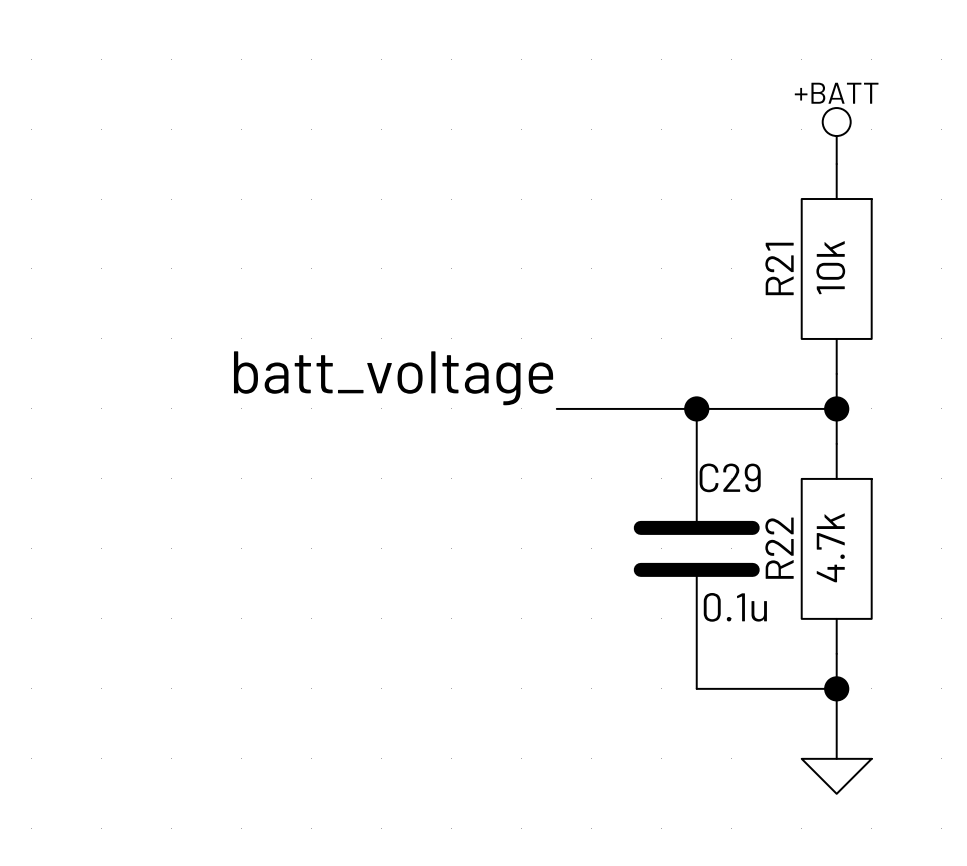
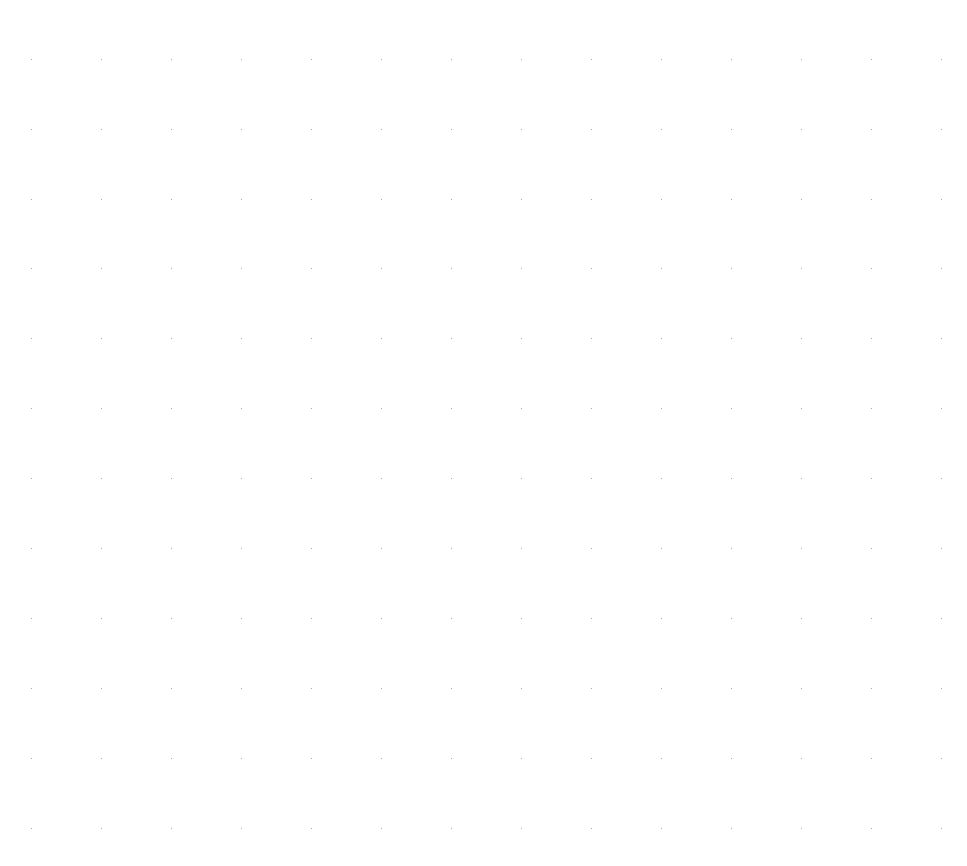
power symbol: +BATT (836, 136) -> none
R21: 10k (836, 268) -> none
wire: (836, 373) (836, 443) -> none
label: batt_voltage (393, 378) -> none
wire: (556, 408) (836, 408) -> none
junction: (696, 408) -> none
junction: (836, 408) -> none
C29: 0.1u (696, 548) -> none
R22: 4.7k (836, 548) -> none
wire: (836, 653) (836, 758) -> none
wire: (696, 688) (836, 688) -> none
junction: (836, 688) -> none
power symbol: (836, 776) -> none

